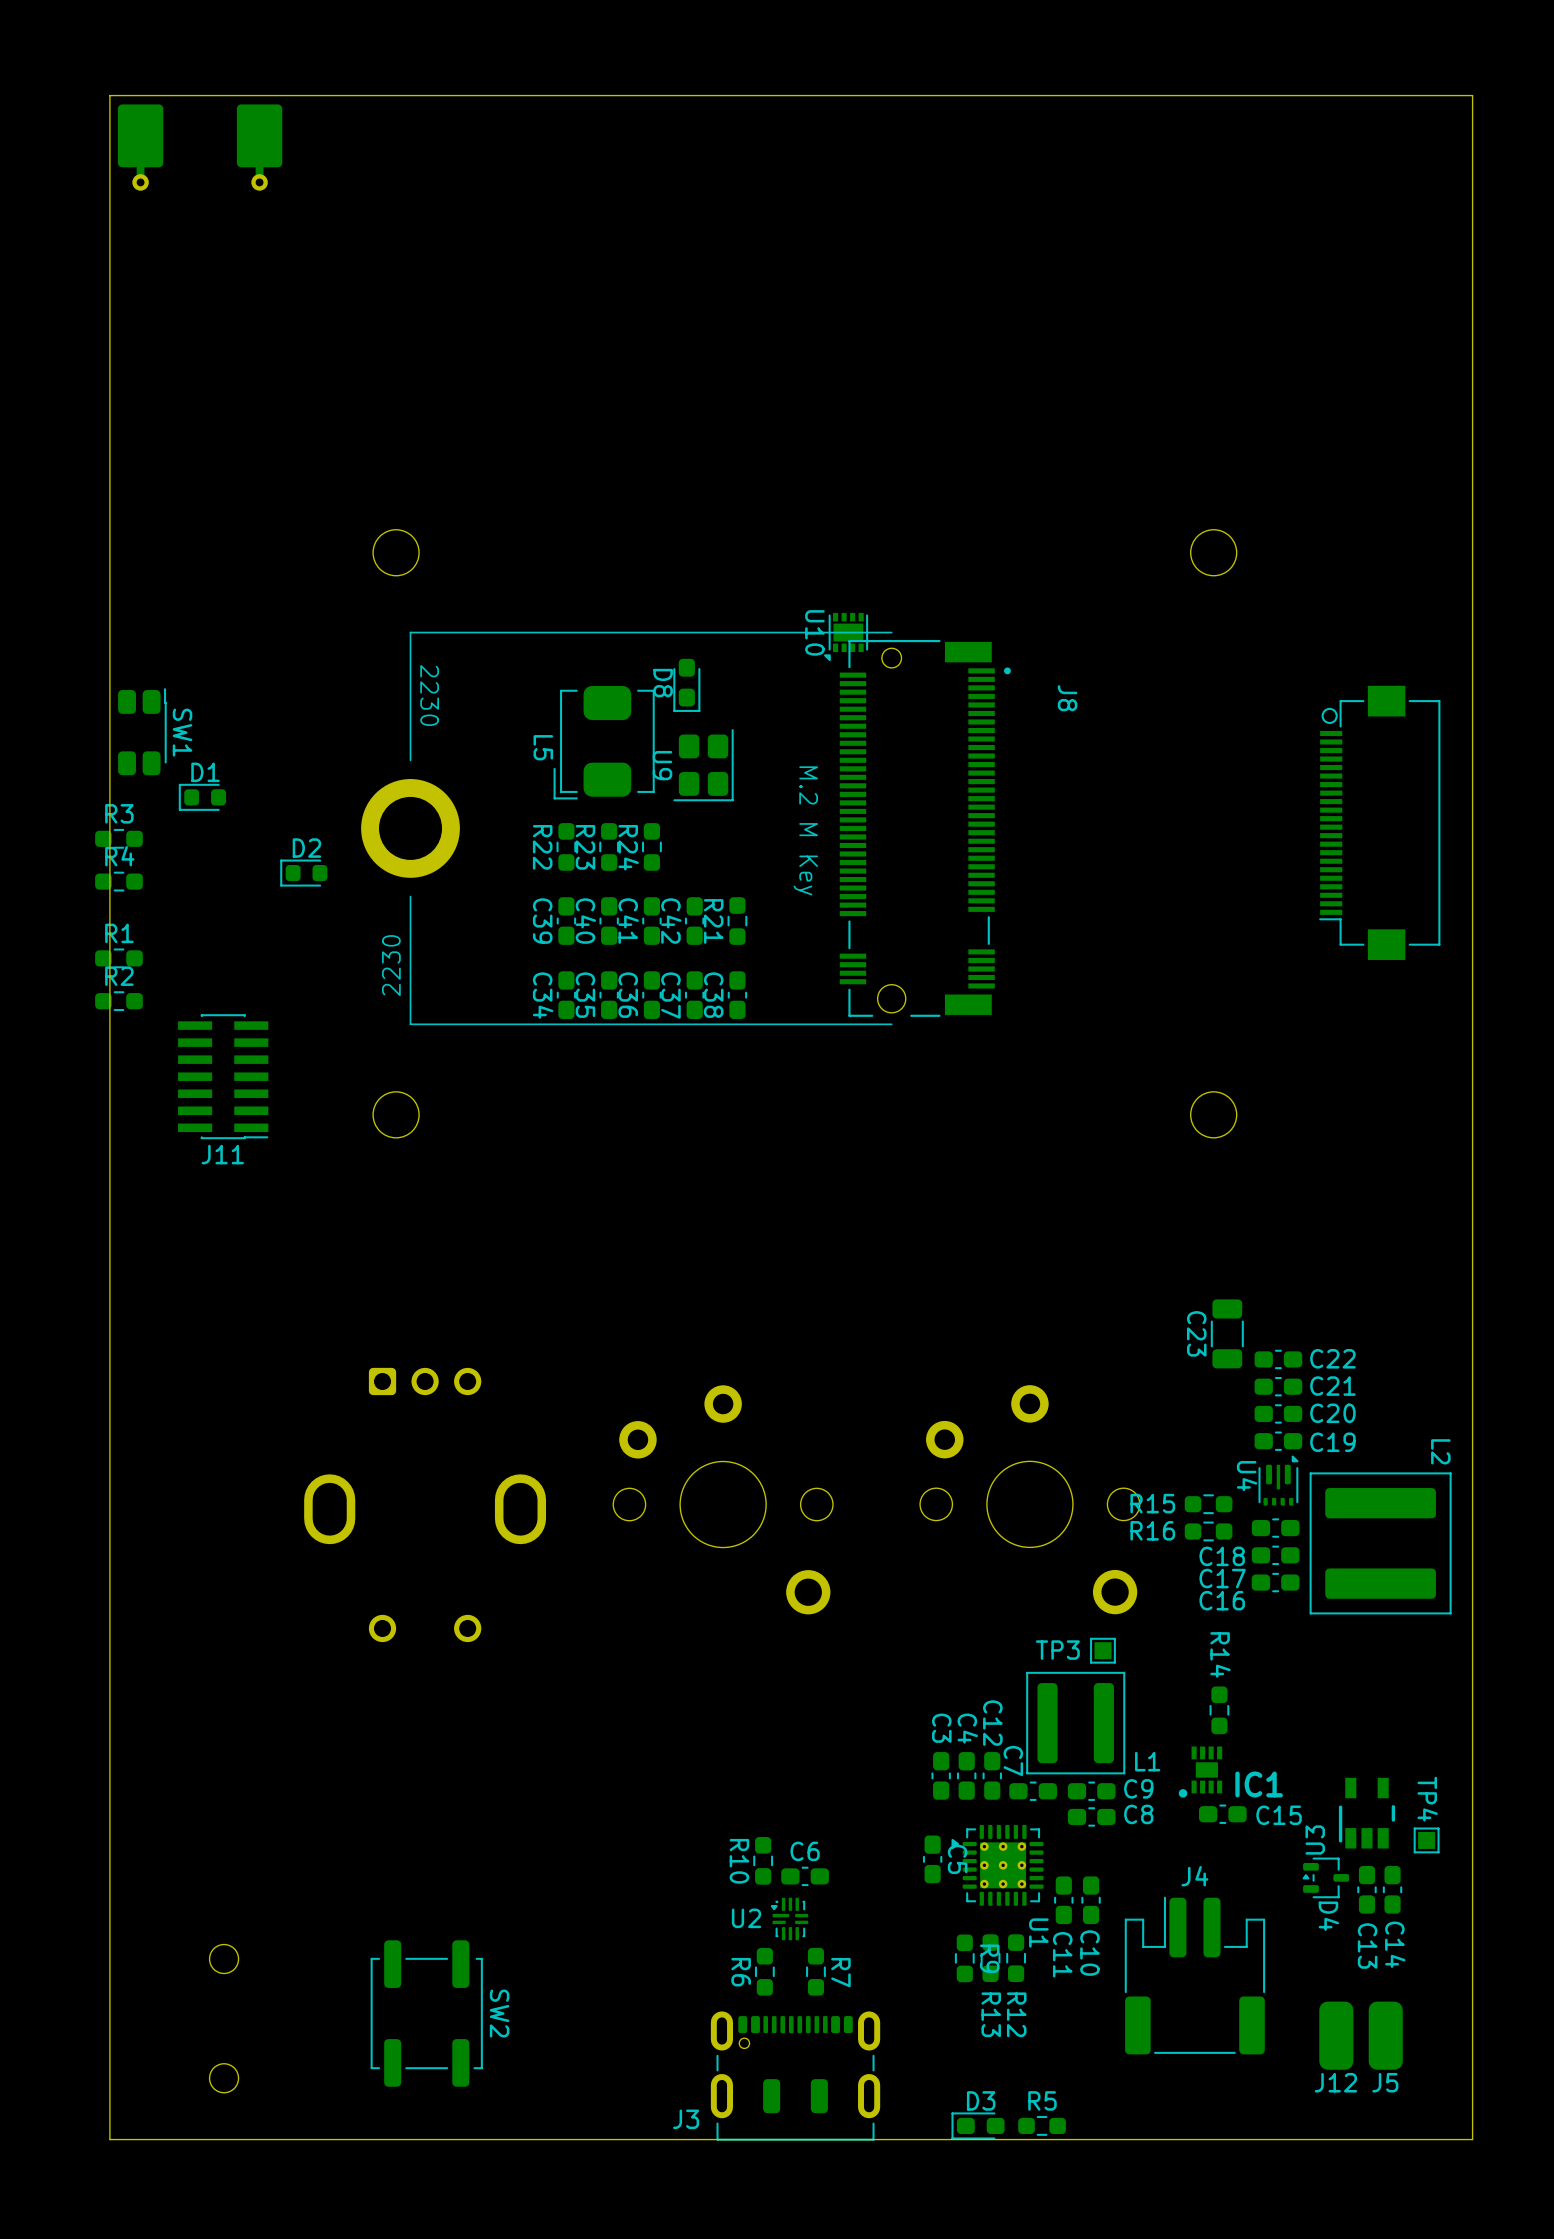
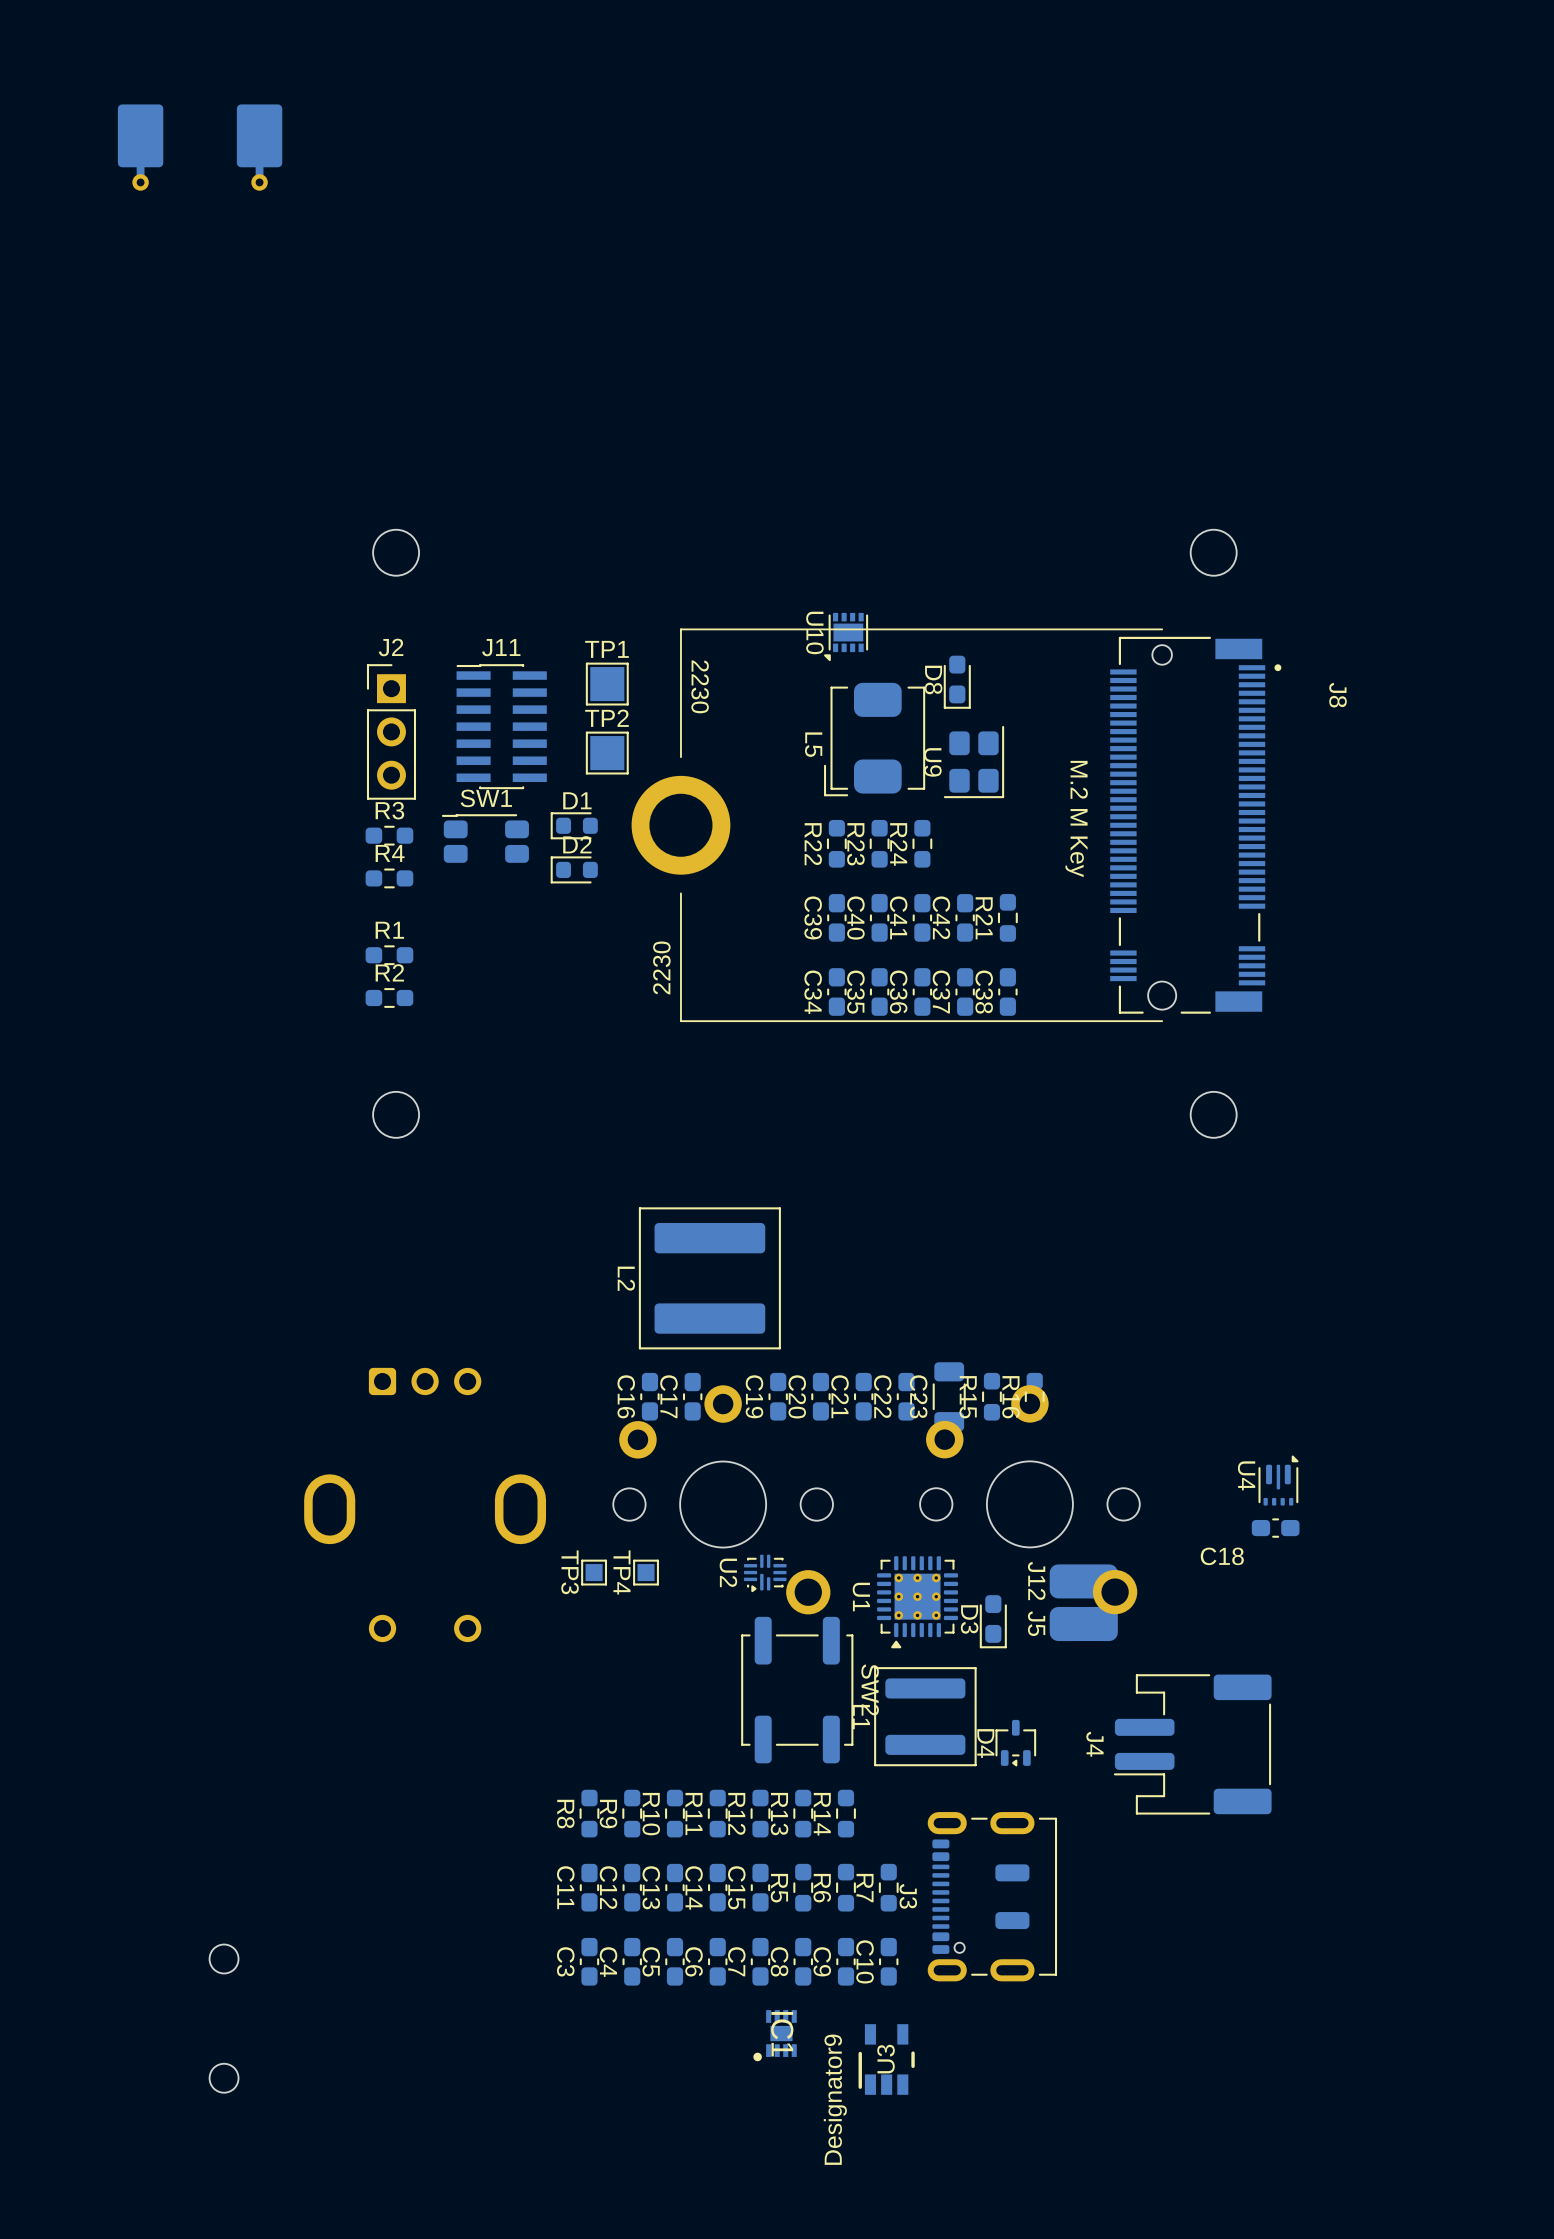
board edge: (1472, 95) (109, 95) (109, 2139) (1472, 2139) (1472, 95) -> none
TP1: none -> (607, 684)
D8 position: (686, 685) -> (957, 682)
SW1 rotation: 0° (142, 731) -> 90° counterclockwise (485, 838)
SW1 position: (142, 731) -> (485, 838)
J2: none -> (391, 731)
L5 position: (604, 742) -> (874, 739)
TP2: none -> (607, 753)
U9 position: (703, 765) -> (973, 762)
D1 position: (202, 797) -> (574, 825)
part: (1379, 822) -> none
J8 position: (685, 828) -> (956, 825)
R3 position: (118, 838) -> (389, 835)
R22 position: (566, 846) -> (836, 843)
R23 position: (609, 846) -> (879, 843)
R24 position: (651, 846) -> (922, 843)
D2 position: (303, 873) -> (574, 869)
R4 position: (118, 881) -> (389, 878)
C39 position: (566, 921) -> (836, 917)
C40 position: (609, 921) -> (879, 917)
C41 position: (651, 921) -> (922, 917)
C42 position: (694, 921) -> (965, 917)
R21 position: (737, 921) -> (1007, 917)
R1 position: (118, 958) -> (389, 955)
C34 position: (566, 995) -> (836, 991)
C35 position: (609, 995) -> (879, 991)
C36 position: (651, 995) -> (922, 991)
C37 position: (694, 995) -> (965, 991)
C38 position: (737, 995) -> (1007, 991)
R2 position: (118, 1001) -> (389, 997)
J11 rotation: 0° (223, 1076) -> 180° (501, 726)
J11 position: (223, 1076) -> (501, 726)
C23 position: (1227, 1333) -> (949, 1396)
C22 name position: C22 (1332, 1358) -> C22 (882, 1396)
C22 rotation: 0° (1278, 1359) -> 90° clockwise (906, 1396)
C22 position: (1278, 1359) -> (906, 1396)
C21 rotation: 0° (1278, 1386) -> 90° clockwise (863, 1396)
C21 position: (1278, 1386) -> (863, 1396)
C21 name position: C21 (1332, 1386) -> C21 (839, 1396)
C20 rotation: 0° (1278, 1413) -> 90° clockwise (820, 1396)
C20 position: (1278, 1413) -> (820, 1396)
C20 name position: C20 (1332, 1413) -> C20 (797, 1396)
C19 rotation: 0° (1278, 1441) -> 90° clockwise (778, 1396)
C19 position: (1278, 1441) -> (778, 1396)
C19 name position: C19 (1332, 1442) -> C19 (754, 1396)
L2 name position: L2 (1440, 1451) -> L2 (626, 1278)
R15 rotation: 0° (1208, 1504) -> 90° clockwise (991, 1396)
R15 position: (1208, 1504) -> (991, 1396)
R16 rotation: 0° (1208, 1531) -> 90° clockwise (1034, 1396)
R16 position: (1208, 1531) -> (1034, 1396)
L2 position: (1380, 1543) -> (709, 1278)
C17 rotation: 0° (1275, 1555) -> 90° clockwise (692, 1396)
C17 position: (1275, 1555) -> (692, 1396)
C17 name position: C17 (1222, 1578) -> C17 (668, 1396)
C16 rotation: 0° (1275, 1582) -> 90° clockwise (649, 1396)
C16 position: (1275, 1582) -> (649, 1396)
C16 name position: C16 (1222, 1600) -> C16 (626, 1396)
TP3 name rotation: 0° (1057, 1650) -> 90° clockwise (570, 1572)
TP3 position: (1102, 1650) -> (594, 1572)
R14 name position: R14 (1220, 1654) -> R14 (822, 1814)
R14 position: (1219, 1710) -> (845, 1813)
C12 name position: C12 (992, 1723) -> C12 (608, 1887)
L1 rotation: 0° (1075, 1723) -> 90° clockwise (925, 1716)
L1 position: (1075, 1723) -> (925, 1716)
C3 name position: C3 (941, 1728) -> C3 (565, 1961)
C4 name position: C4 (967, 1728) -> C4 (608, 1962)
L1 name position: L1 (1147, 1761) -> L1 (861, 1717)
IC1 position: (1200, 1772) -> (775, 2035)
C3 position: (941, 1775) -> (589, 1961)
C4 position: (966, 1775) -> (632, 1961)
C12 position: (992, 1775) -> (632, 1887)
IC1 name rotation: 0° (1259, 1784) -> 90° clockwise (782, 2034)
C9 name position: C9 (1138, 1788) -> C9 (822, 1961)
C7 rotation: 0° (1033, 1791) -> 90° clockwise (760, 1961)
C7 position: (1033, 1791) -> (760, 1961)
C9 rotation: 0° (1091, 1791) -> 90° clockwise (845, 1961)
C9 position: (1091, 1791) -> (845, 1961)
TP4 name position: TP4 (1427, 1799) -> TP4 (621, 1572)
R8: none -> (589, 1813)
R11: none -> (717, 1813)
U3 position: (1366, 1813) -> (886, 2059)
C8 name position: C8 (1138, 1814) -> C8 (779, 1961)
C15 rotation: 0° (1222, 1814) -> 90° clockwise (760, 1887)
C15 position: (1222, 1814) -> (760, 1887)
C15 name position: C15 (1279, 1815) -> C15 (736, 1887)
C8 rotation: 0° (1091, 1816) -> 90° clockwise (803, 1961)
C8 position: (1091, 1816) -> (803, 1961)
U3 name position: U3 (1315, 1840) -> U3 (886, 2059)
TP4 position: (1426, 1840) -> (646, 1572)
C6 name position: C6 (805, 1851) -> C6 (694, 1961)
C5 position: (932, 1859) -> (674, 1961)
C5 name position: C5 (957, 1859) -> C5 (651, 1961)
R10 position: (763, 1860) -> (674, 1813)
U1 rotation: 0° (997, 1865) -> 90° counterclockwise (917, 1602)
U1 position: (997, 1865) -> (917, 1602)
C6 rotation: 0° (805, 1876) -> 90° clockwise (717, 1961)
C6 position: (805, 1876) -> (717, 1961)
D4 rotation: 0° (1325, 1877) -> 90° counterclockwise (1015, 1743)
D4 position: (1325, 1877) -> (1015, 1743)
C13 position: (1366, 1889) -> (674, 1887)
C14 position: (1392, 1889) -> (717, 1887)
C11 position: (1063, 1900) -> (589, 1887)
C10 position: (1091, 1900) -> (888, 1961)
D4 name position: D4 (1328, 1916) -> D4 (985, 1743)
U2 rotation: 0° (789, 1918) -> 90° counterclockwise (765, 1573)
U2 position: (789, 1918) -> (765, 1573)
U1 name position: U1 (1038, 1933) -> U1 (861, 1597)
C14 name position: C14 (1395, 1944) -> C14 (694, 1887)
C13 name position: C13 (1367, 1946) -> C13 (651, 1887)
C10 name position: C10 (1089, 1953) -> C10 (865, 1961)
C11 name position: C11 (1062, 1954) -> C11 (565, 1887)
R9 position: (964, 1958) -> (632, 1813)
R9 name position: R9 (989, 1958) -> R9 (608, 1814)
R13 position: (990, 1958) -> (803, 1813)
R12 position: (1016, 1958) -> (760, 1813)
R6 position: (764, 1971) -> (845, 1887)
R7 position: (815, 1971) -> (888, 1887)
R7 name position: R7 (840, 1972) -> R7 (865, 1888)
J4 rotation: 0° (1194, 1975) -> 90° counterclockwise (1192, 1744)
J4 position: (1194, 1975) -> (1192, 1744)
SW2 position: (426, 2013) -> (797, 1690)
R13 name position: R13 (991, 2014) -> R13 (779, 1814)
R12 name position: R12 (1016, 2014) -> R12 (736, 1813)
J12 rotation: 0° (1336, 2035) -> 90° clockwise (1083, 1581)
J12 position: (1336, 2035) -> (1083, 1581)
J5 rotation: 0° (1385, 2035) -> 90° clockwise (1083, 1624)
J5 position: (1385, 2035) -> (1083, 1624)
J3 rotation: 0° (795, 2076) -> 90° counterclockwise (992, 1896)
J3 position: (795, 2076) -> (992, 1896)
U3 text: none -> Designator9 (835, 2099)
R5 name position: R5 (1042, 2100) -> R5 (779, 1888)
J3 name position: J3 (686, 2119) -> J3 (908, 1896)
D3 rotation: 0° (978, 2125) -> 90° counterclockwise (993, 1621)
D3 position: (978, 2125) -> (993, 1621)
R5 rotation: 0° (1042, 2125) -> 90° clockwise (803, 1887)
R5 position: (1042, 2125) -> (803, 1887)

